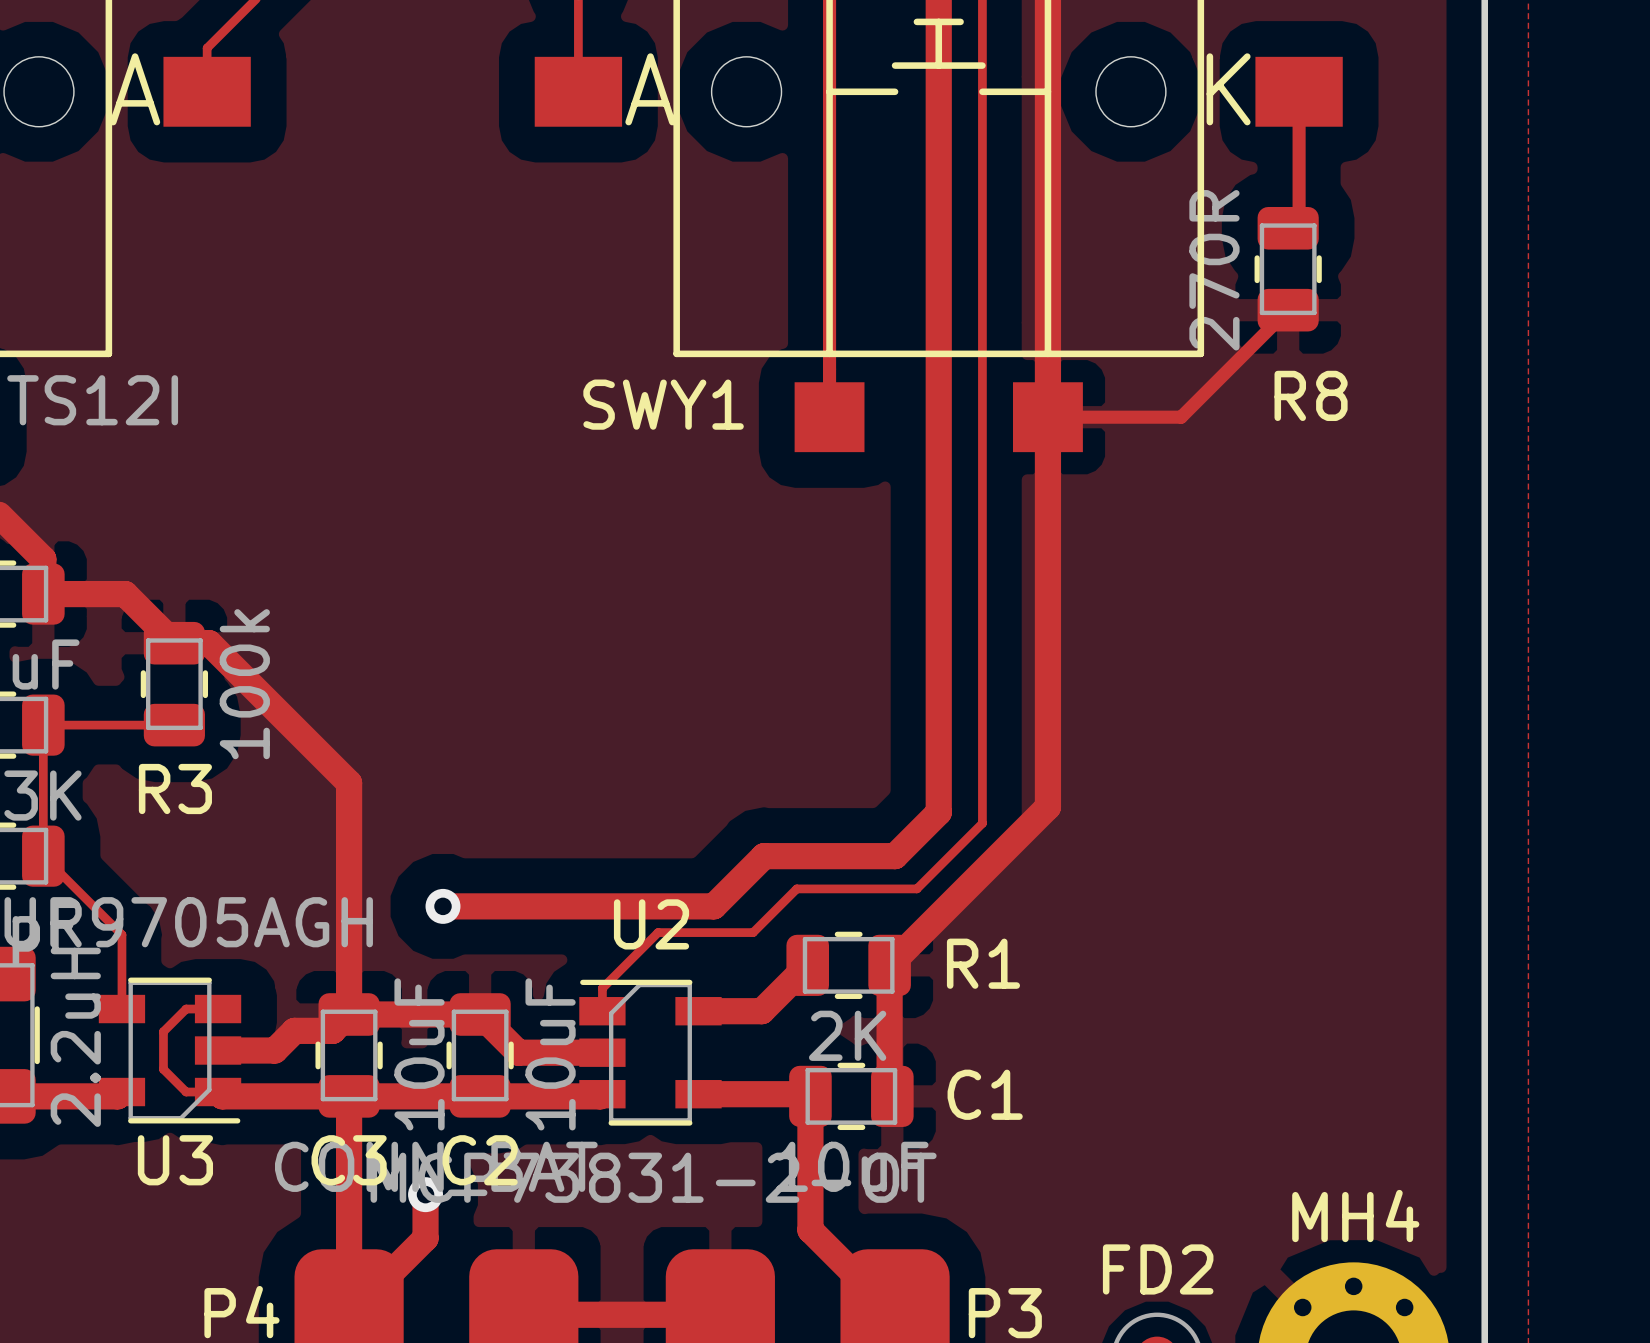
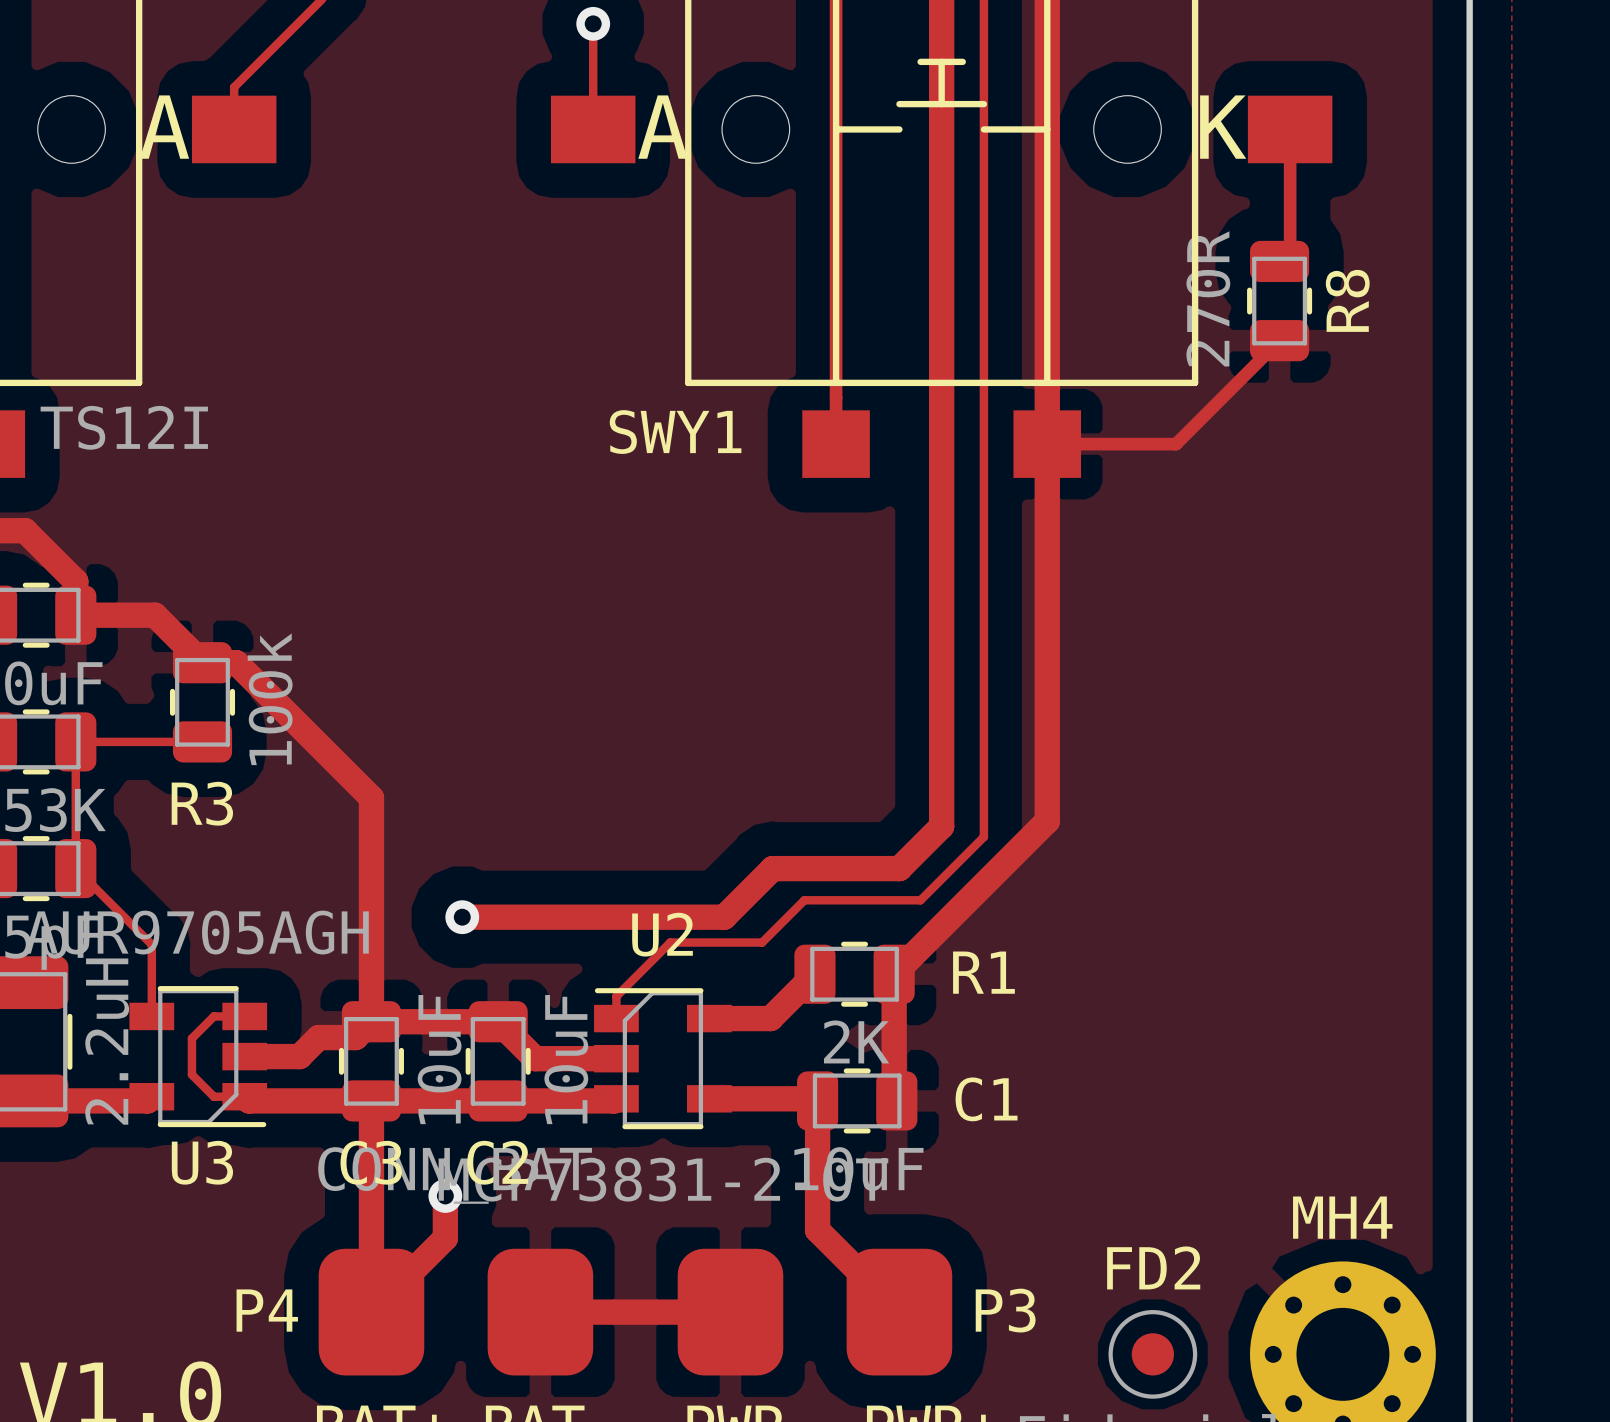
R8 name rotation: 0° (1311, 395) -> 90° counterclockwise (1347, 300)
R8 name position: R8 (1311, 395) -> R8 (1347, 300)

